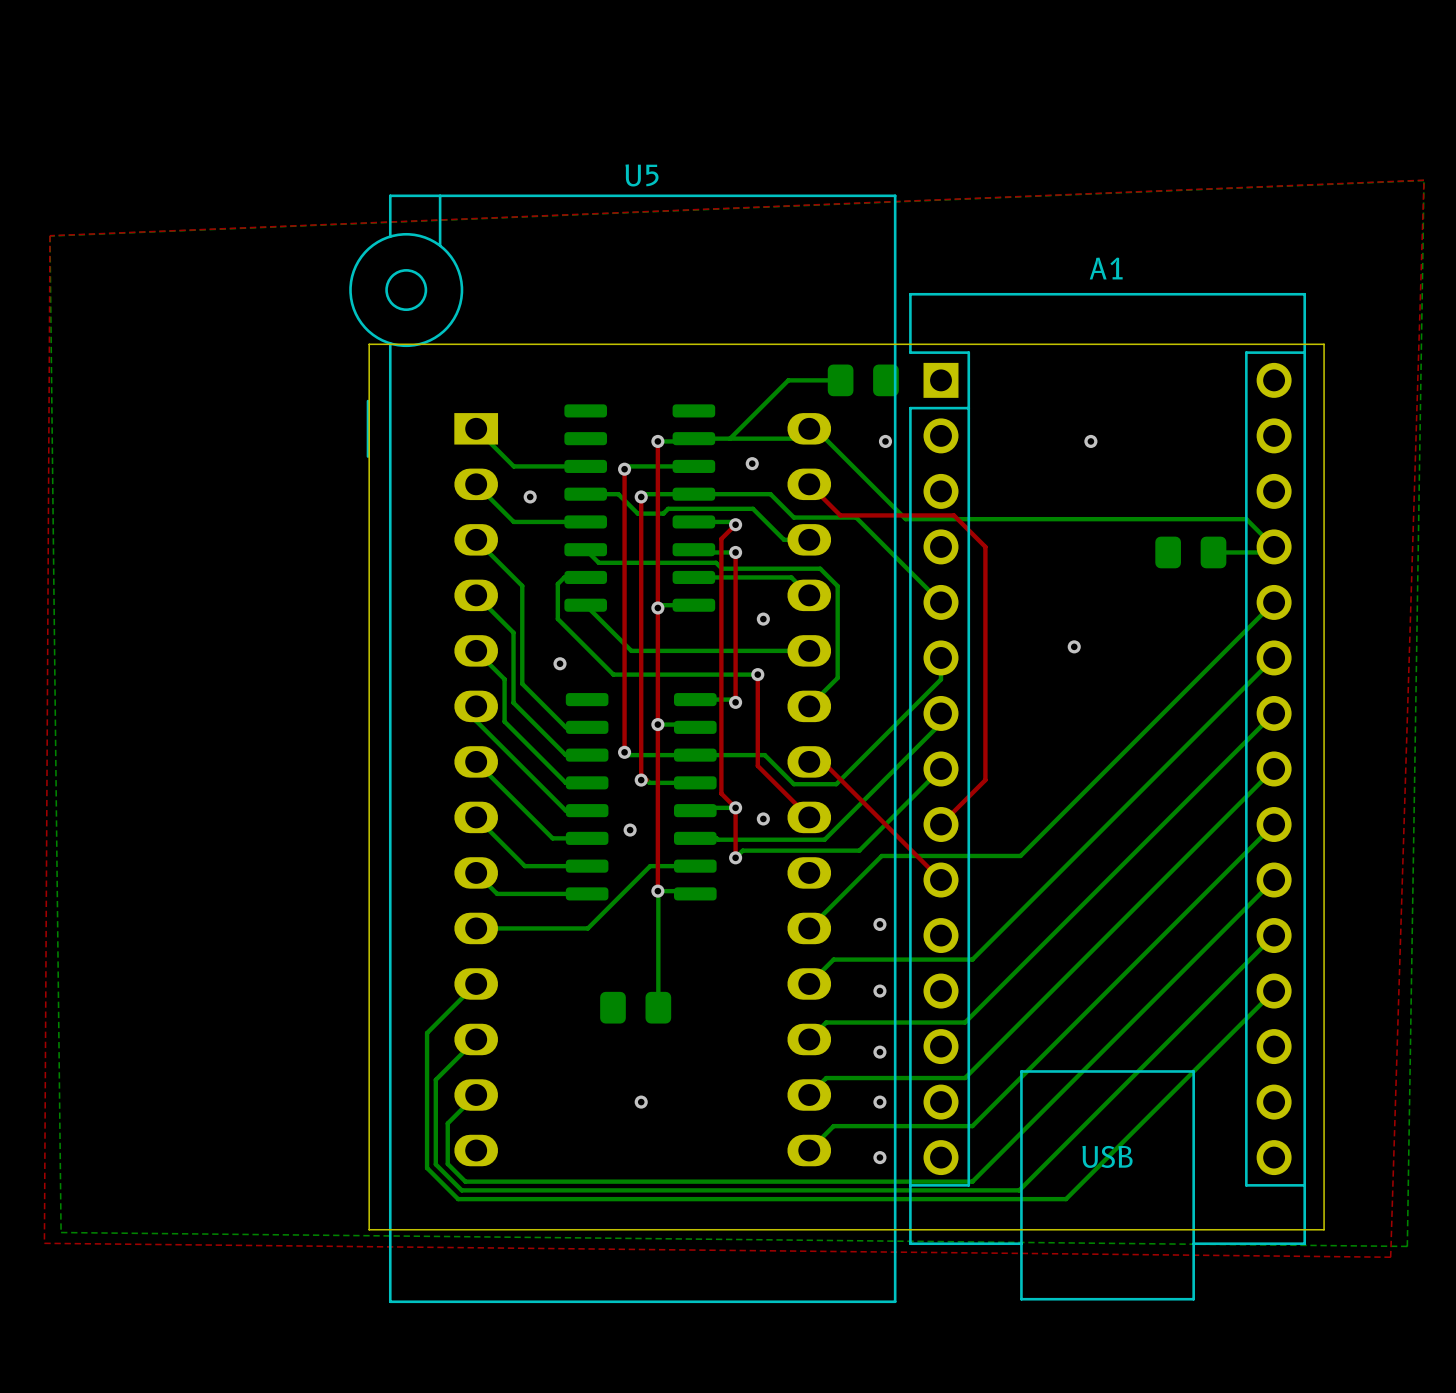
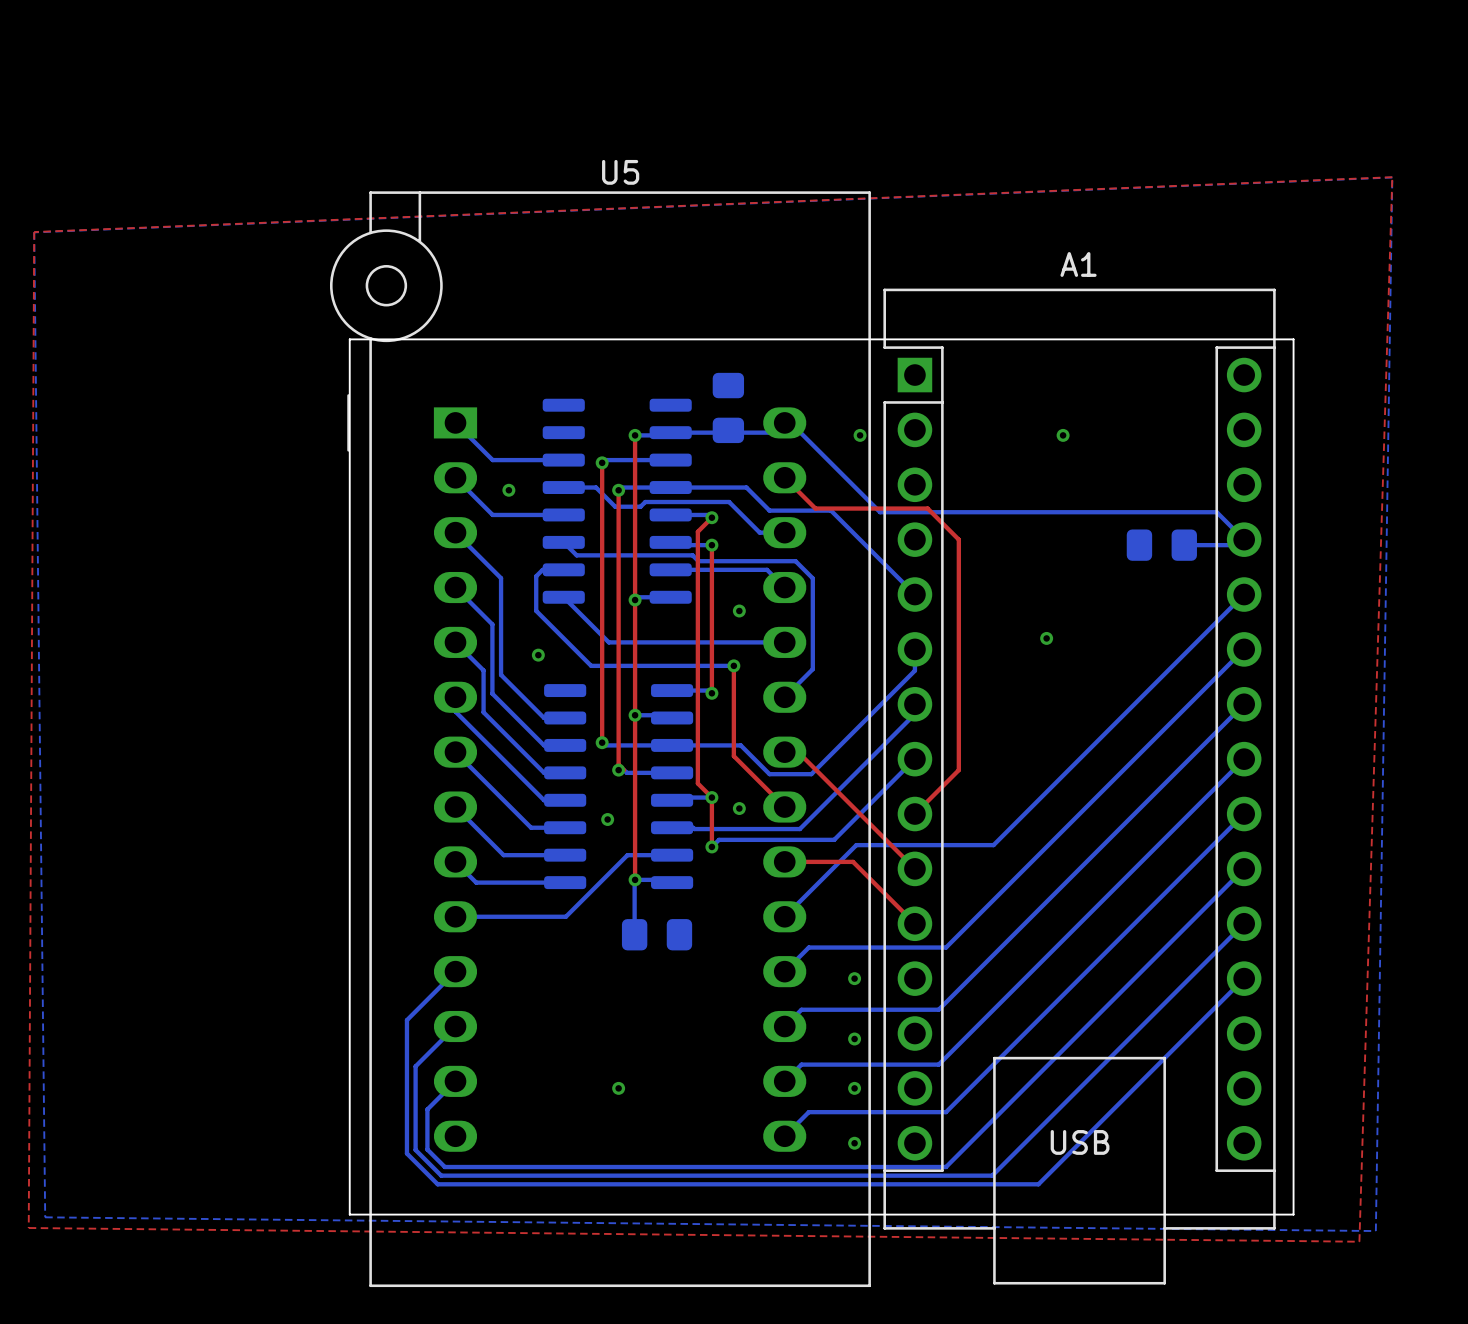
bottom track: (846, 380) (788, 380) (730, 438) -> none
part rotation: 0° (863, 380) -> 90° clockwise (728, 407)
part position: (863, 380) -> (728, 407)
via: (752, 463) -> none
top track: none -> (784, 861) (853, 861) (914, 923)
bottom track: (658, 891) (658, 1007) -> (635, 879) (634, 934)
via: (879, 924) -> none
part position: (635, 1007) -> (657, 934)

